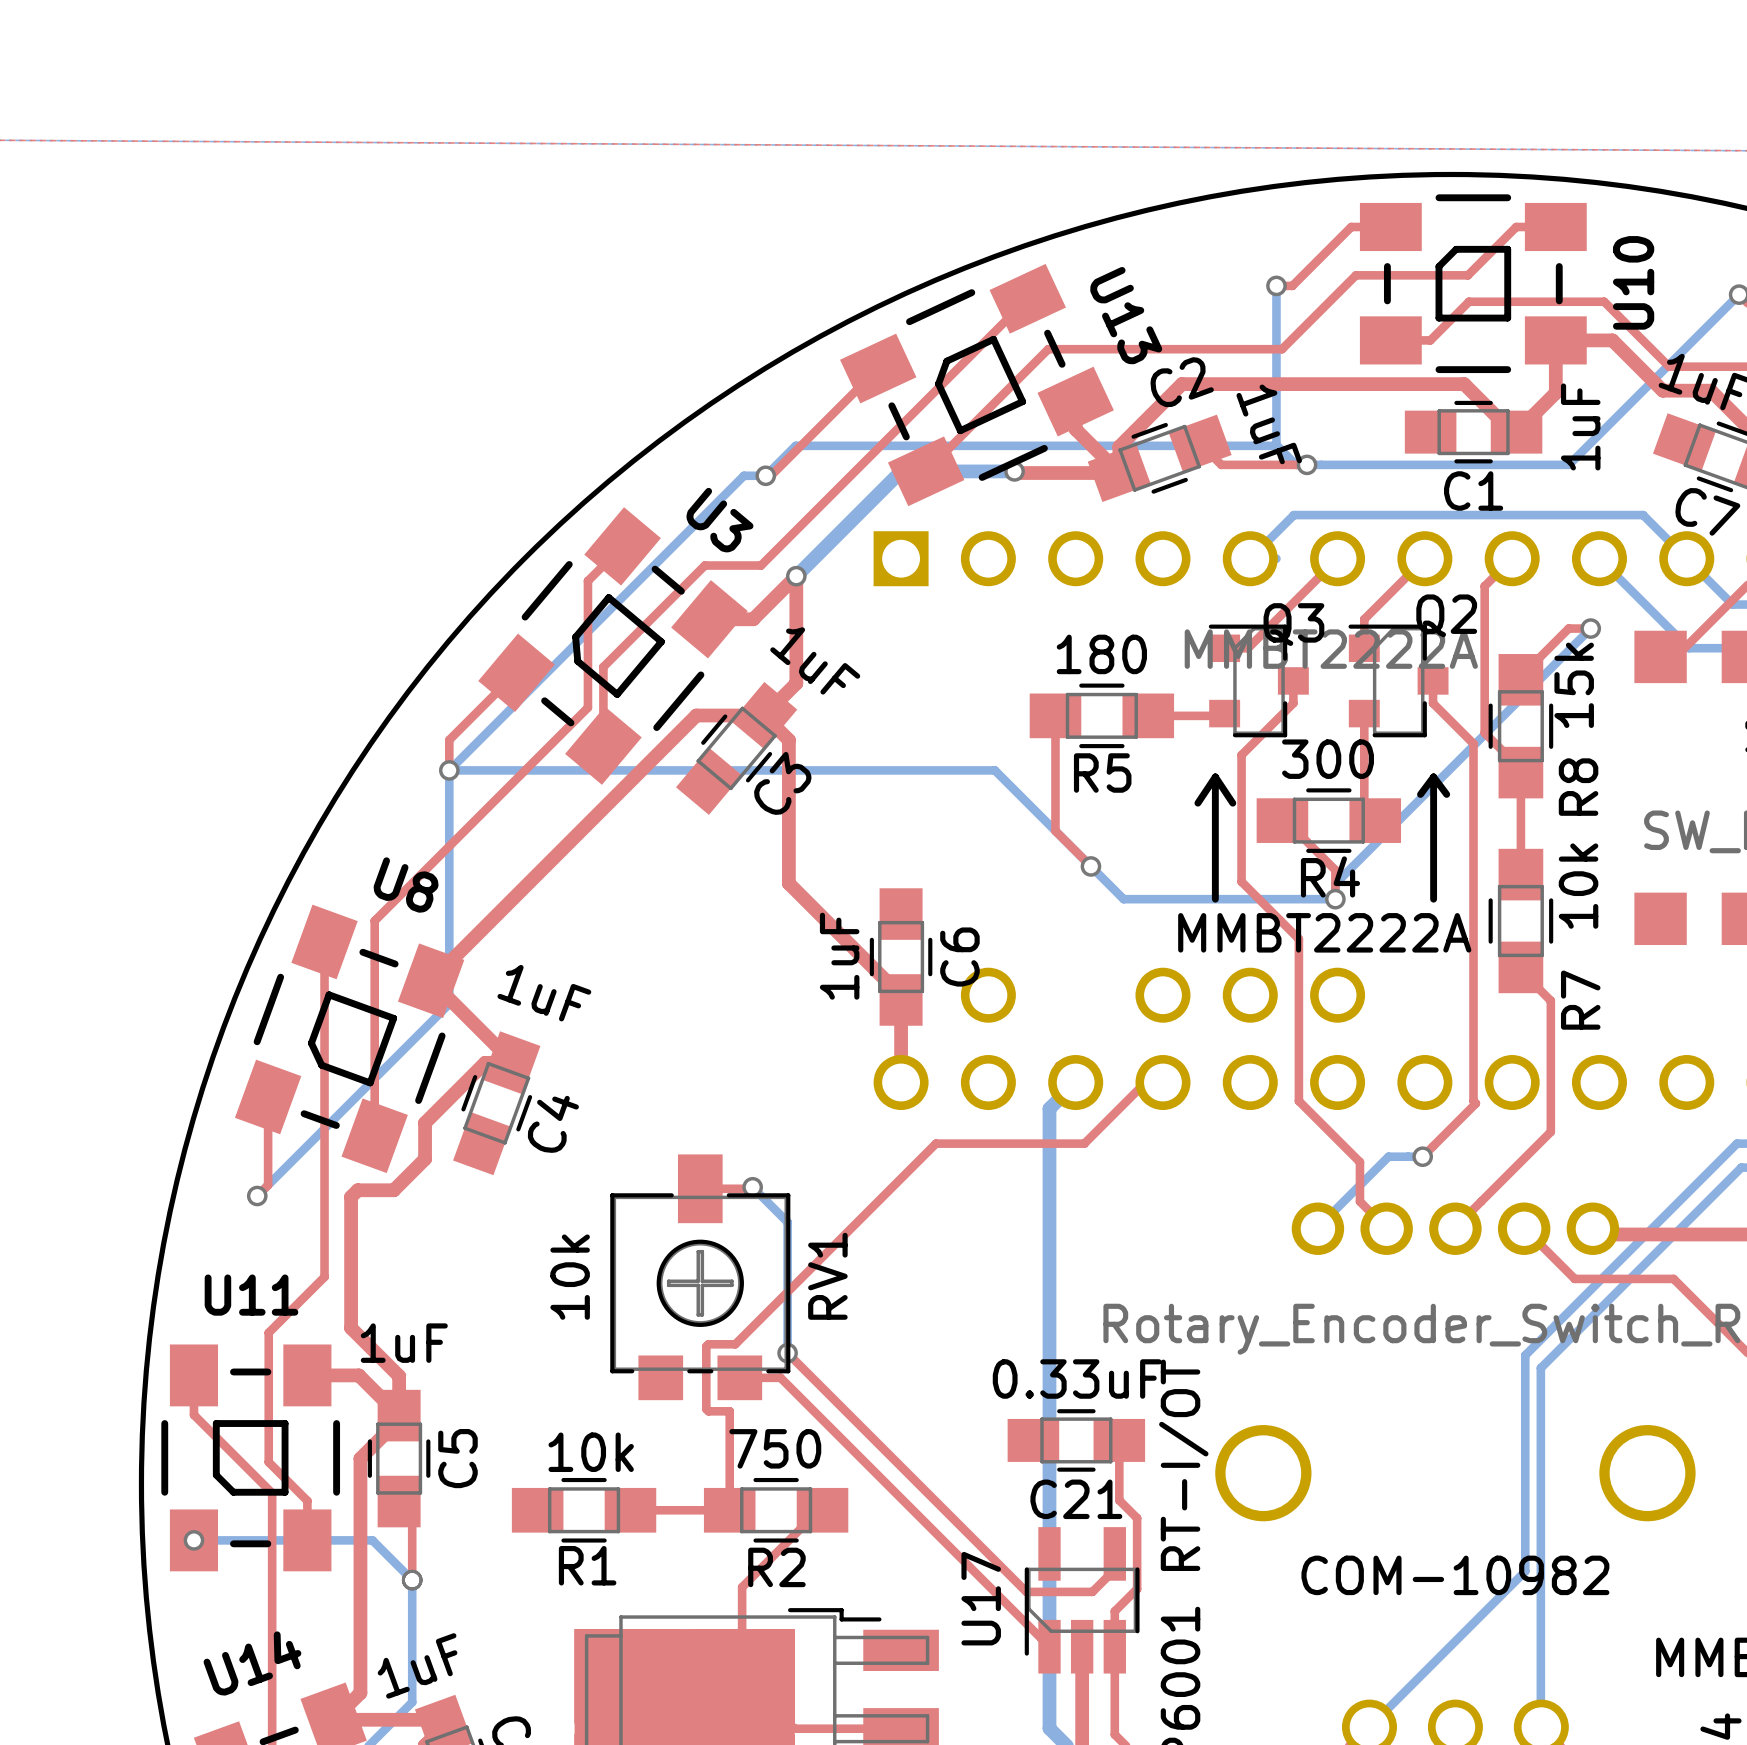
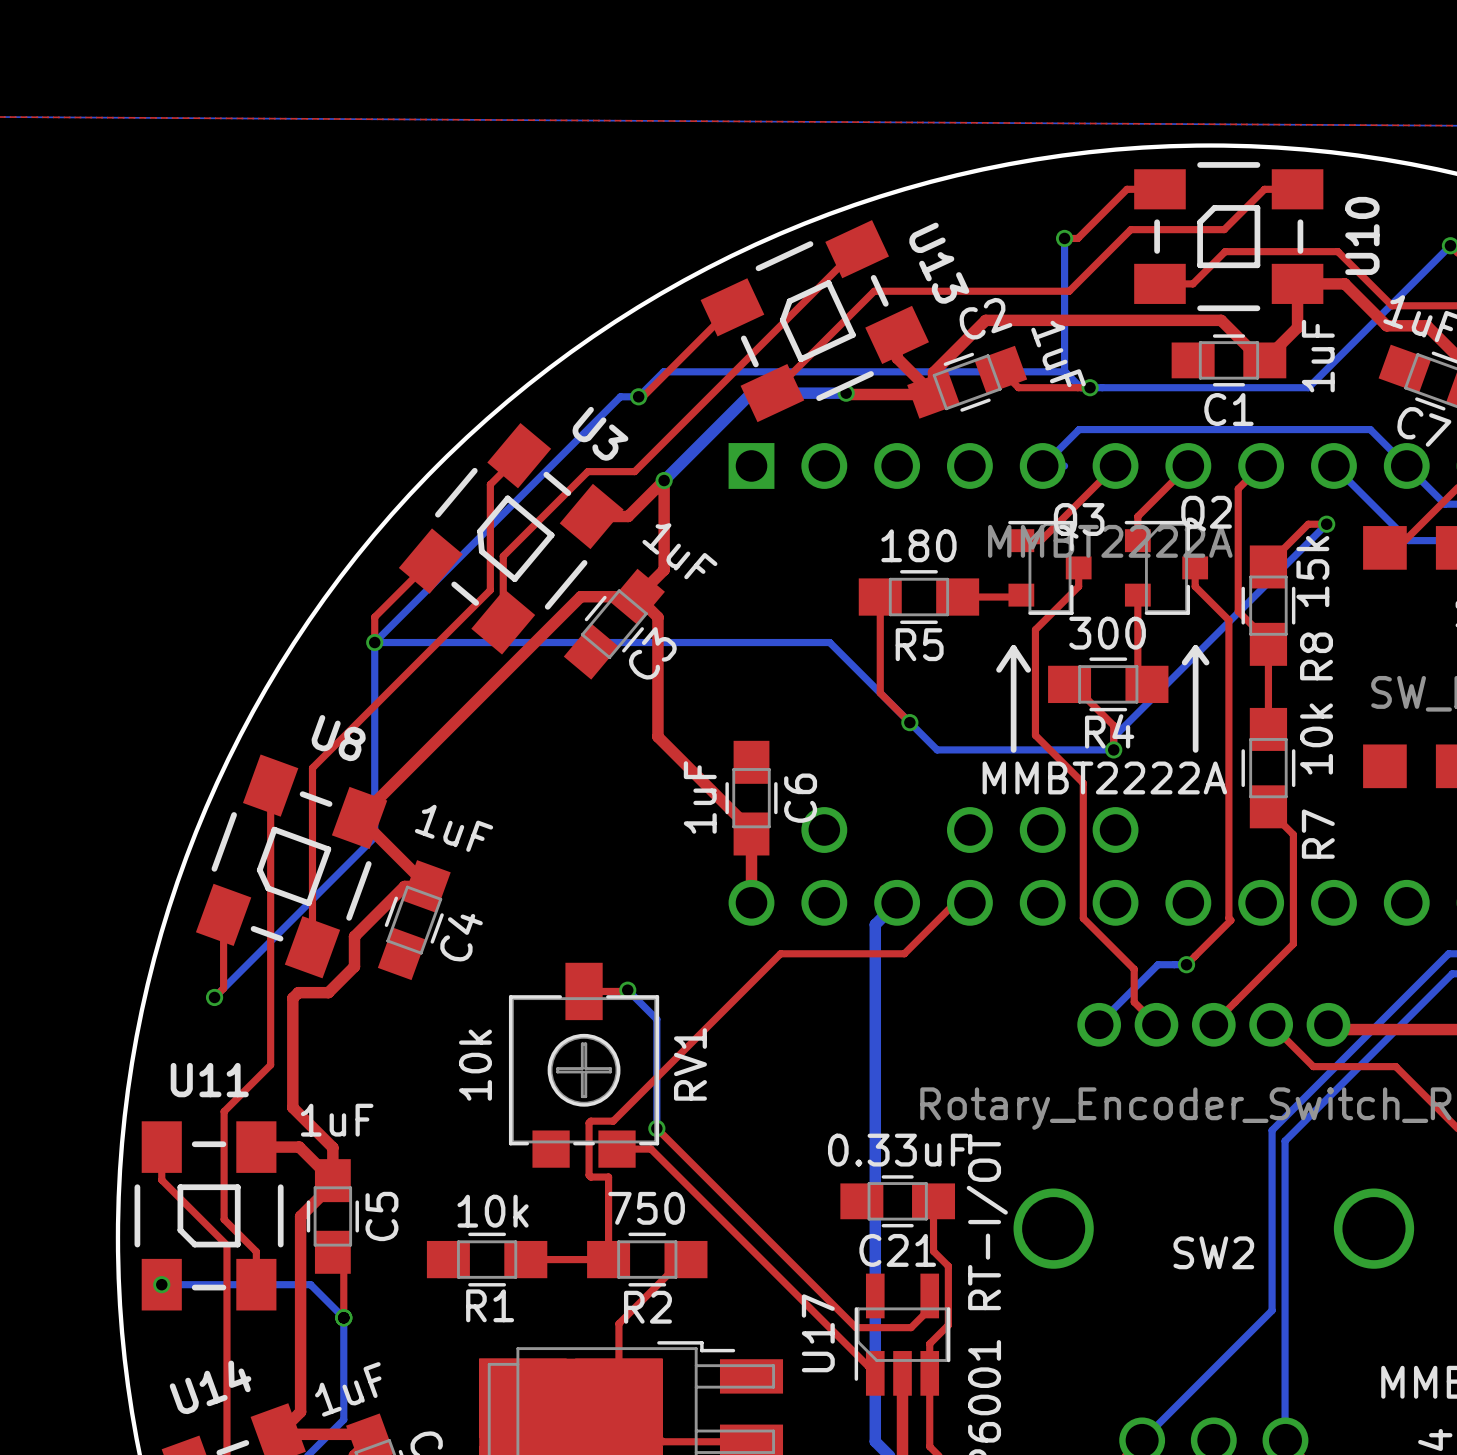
COM-10982 name: COM-10982 (1455, 1575) -> SW2 (1213, 1252)

